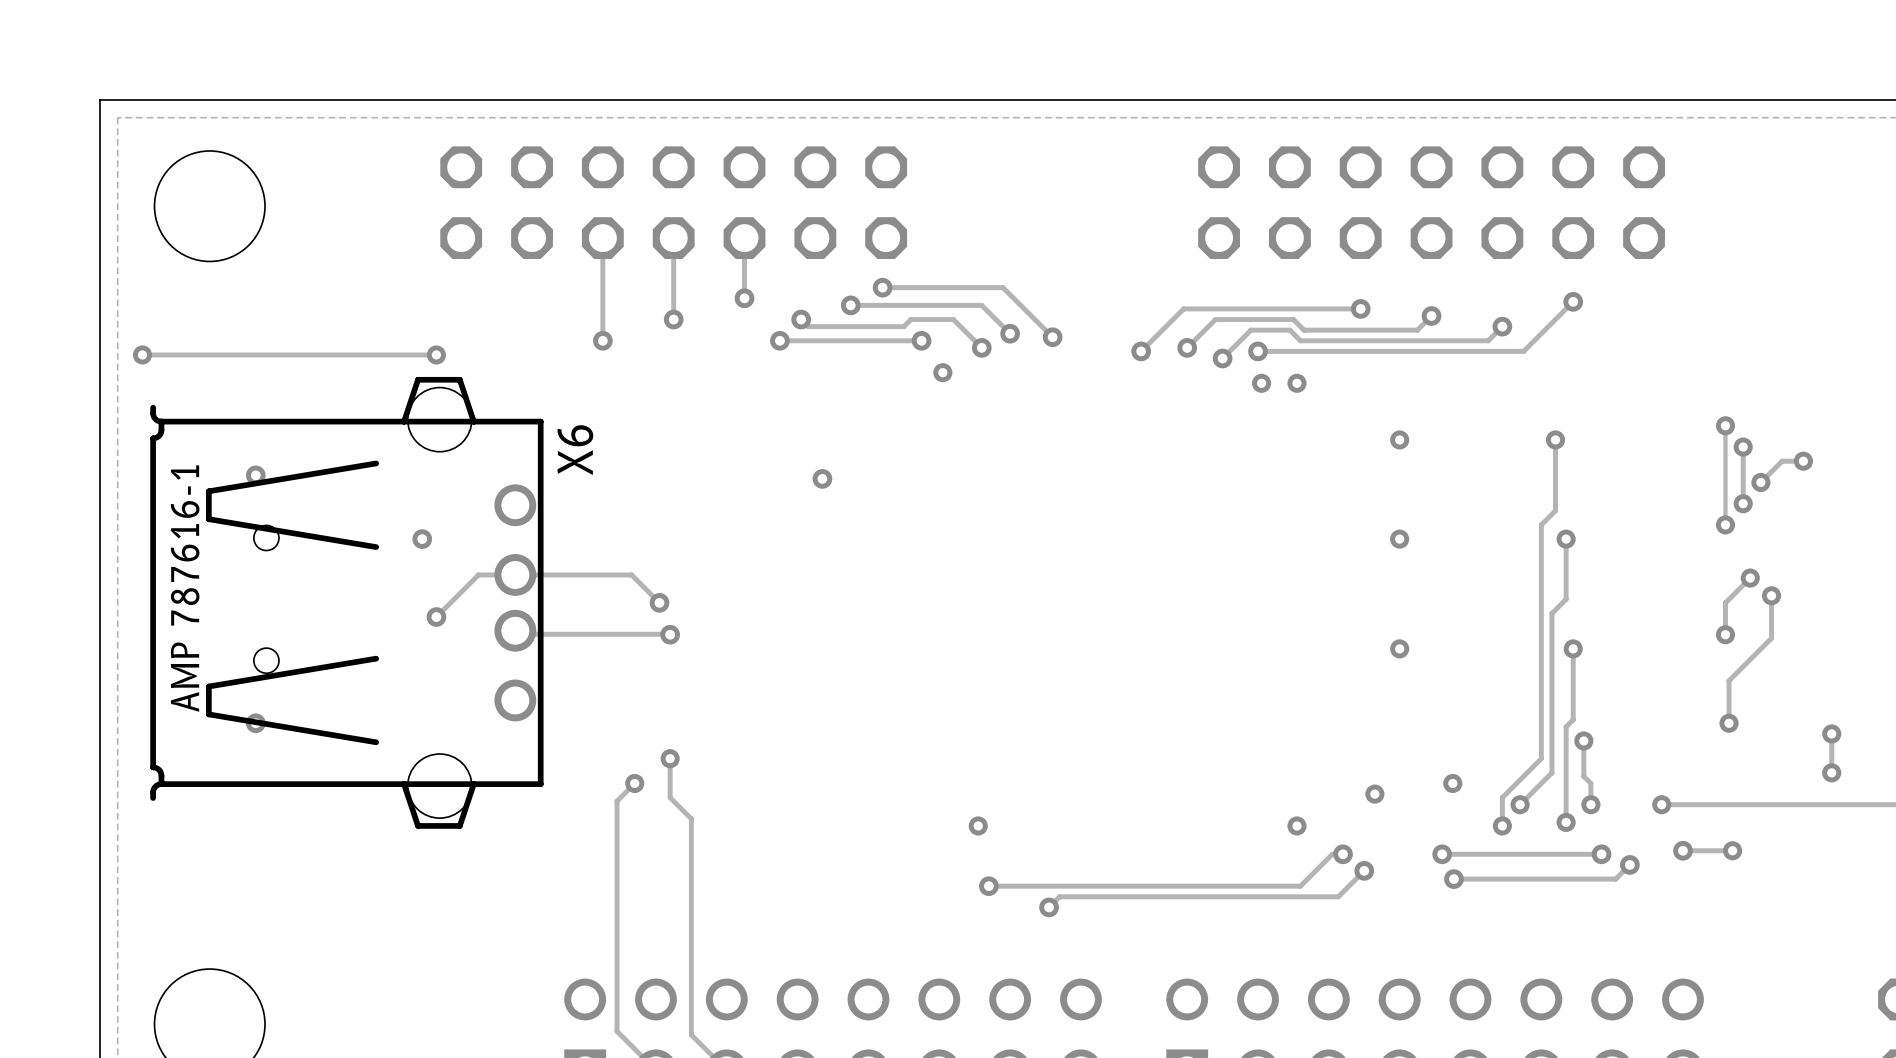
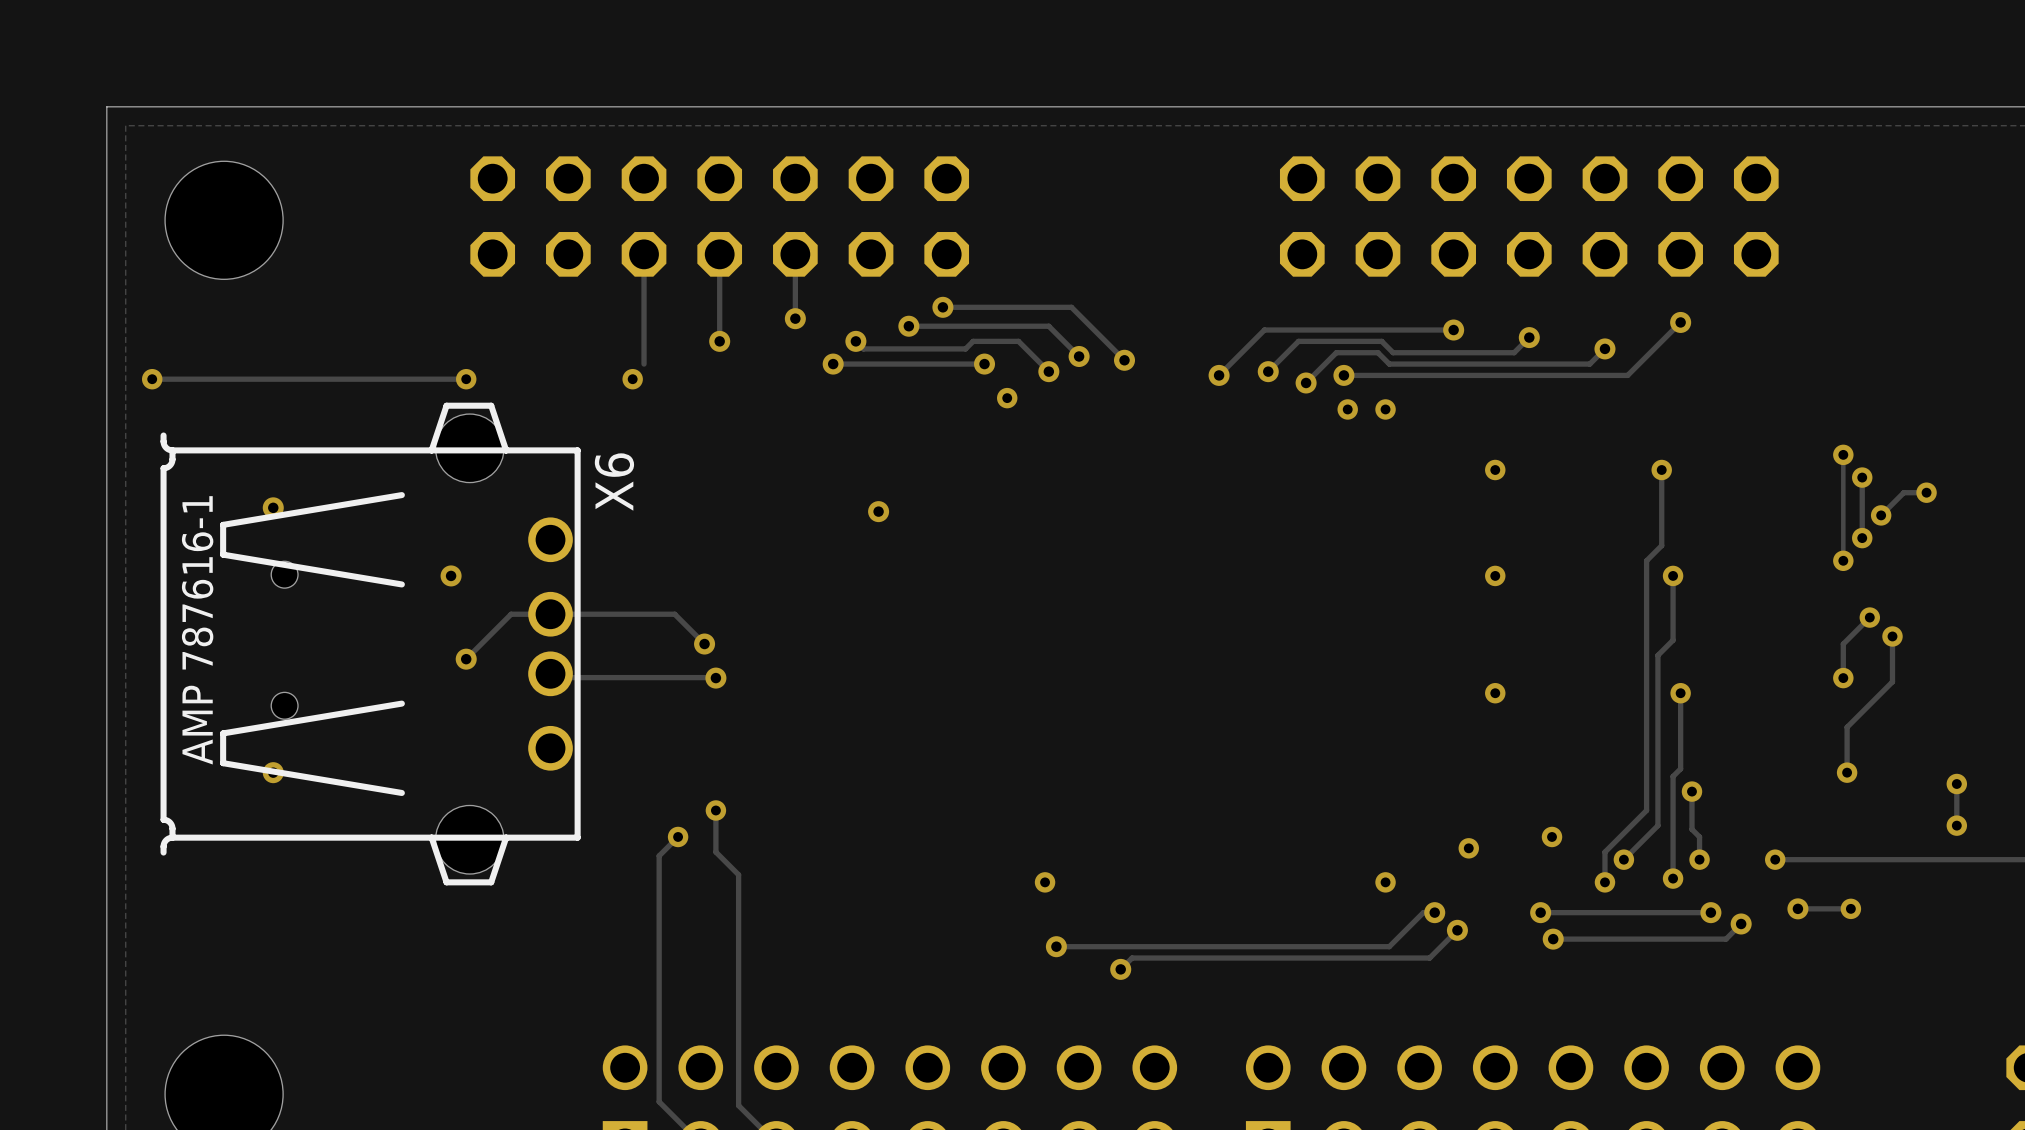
via position: (602, 340) -> (632, 379)

